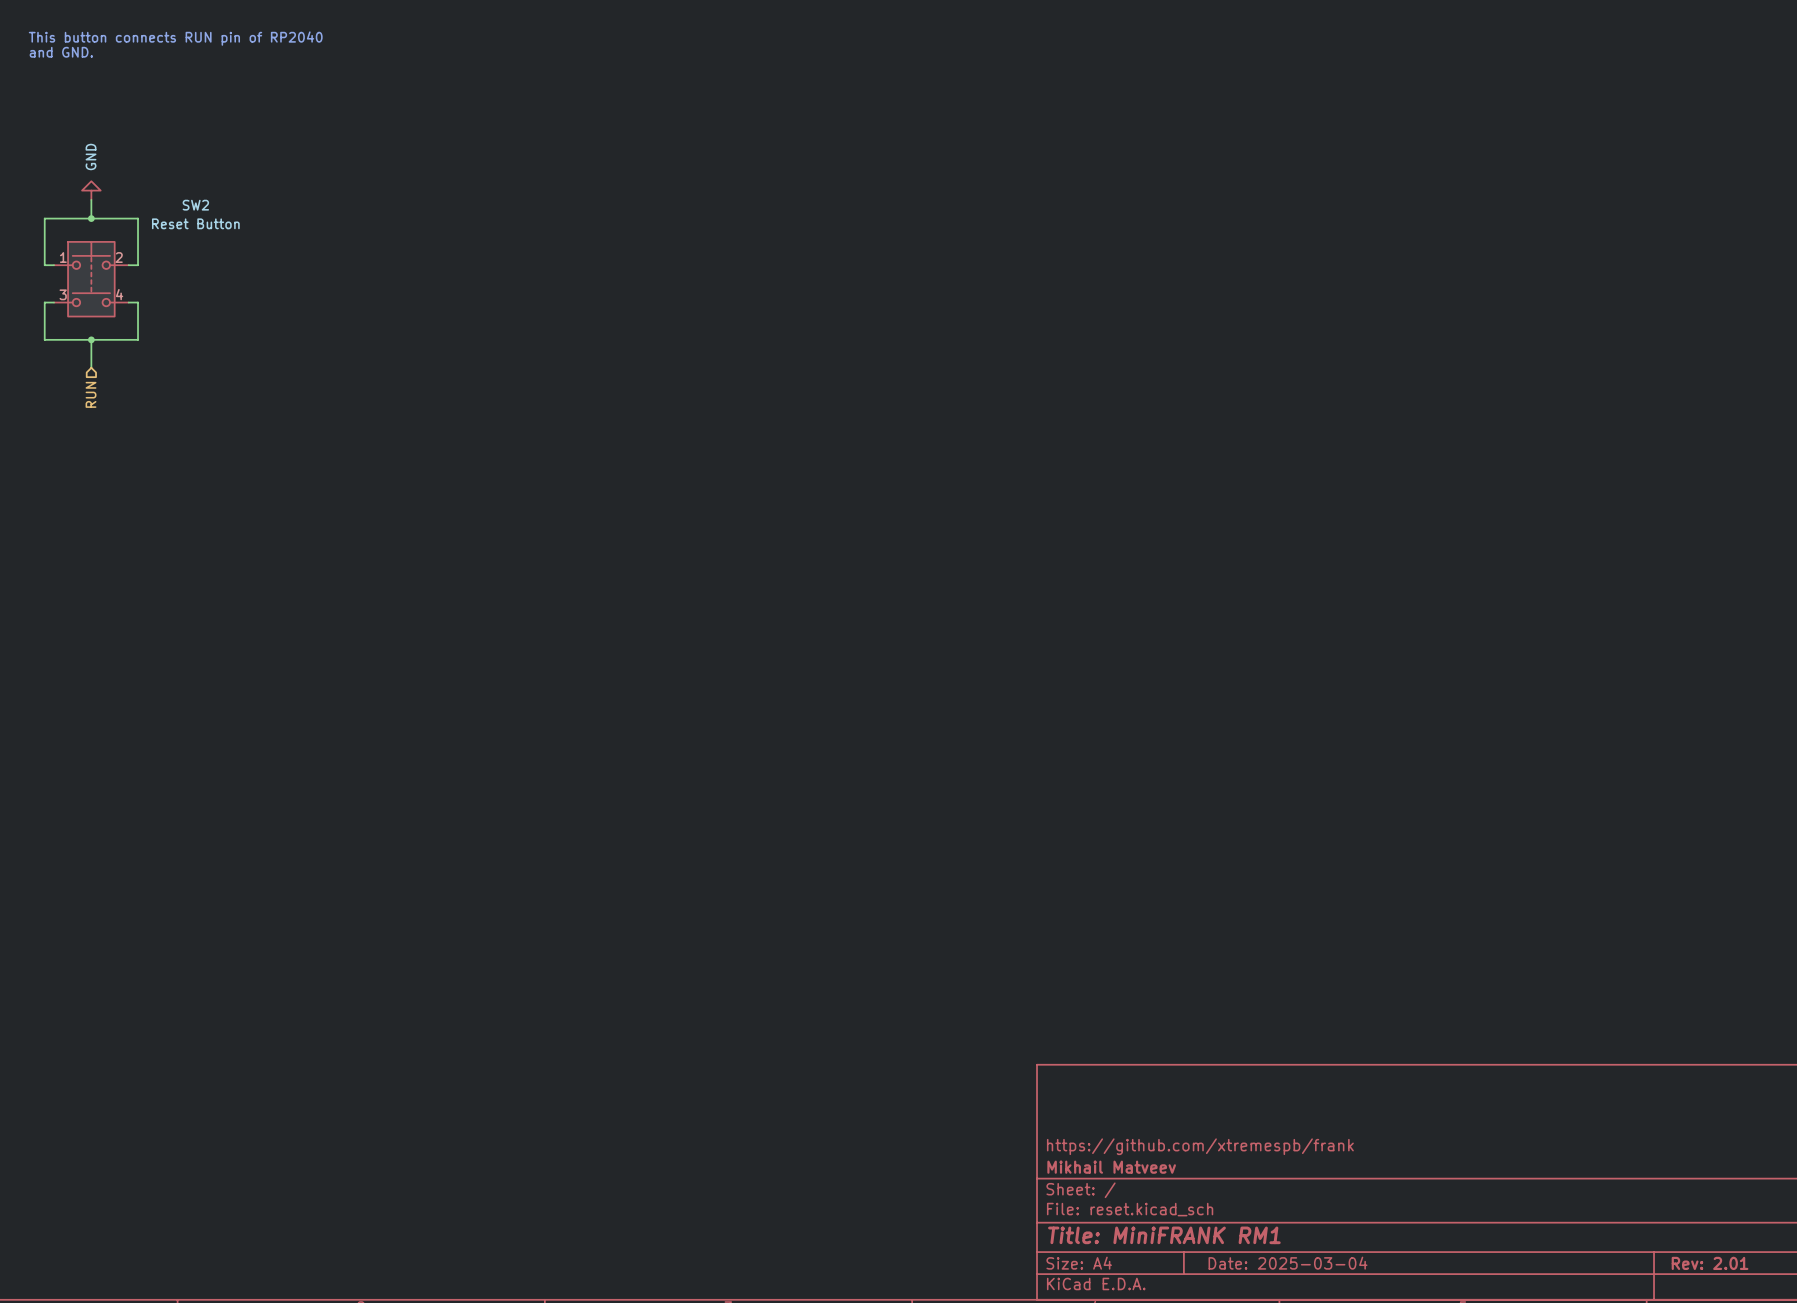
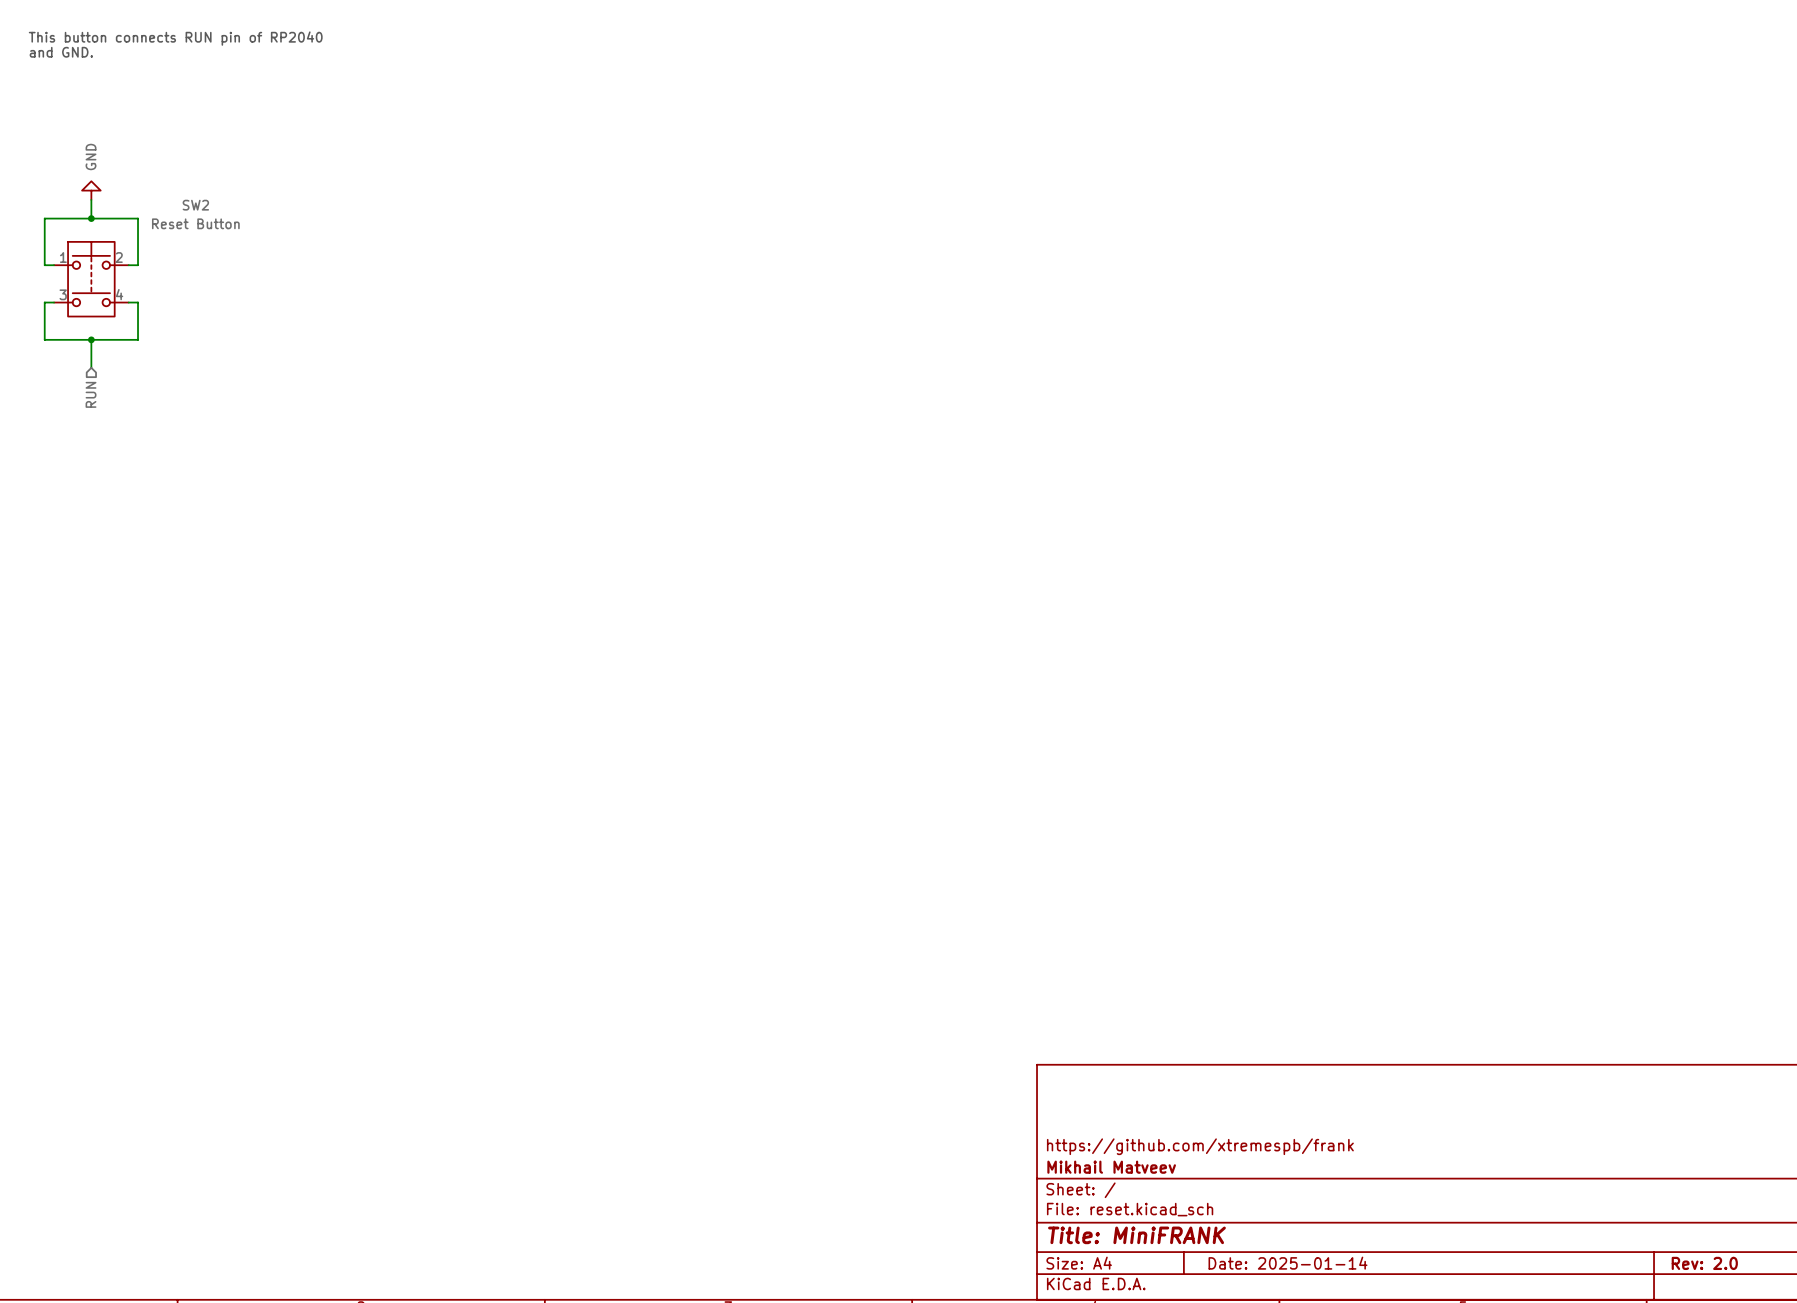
title block: Title: MiniFRANK RM1 (1164, 1235) -> Title: MiniFRANK (1136, 1235)
title block: Date: 2025-03-04 (1288, 1263) -> Date: 2025-01-14 (1288, 1263)
title block: Rev: 2.01 (1710, 1263) -> Rev: 2.0 (1704, 1263)

